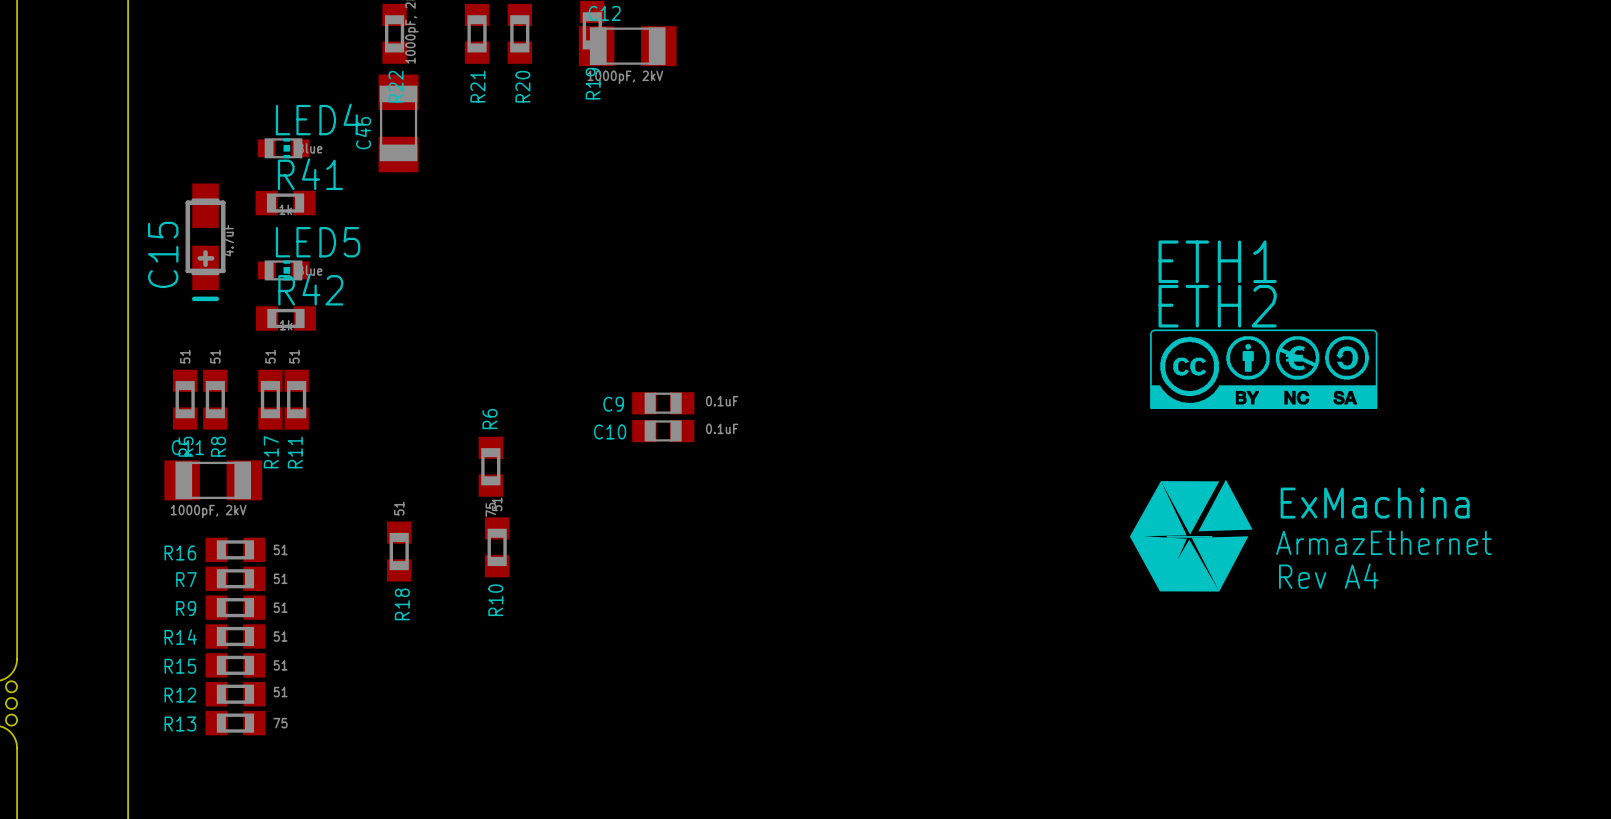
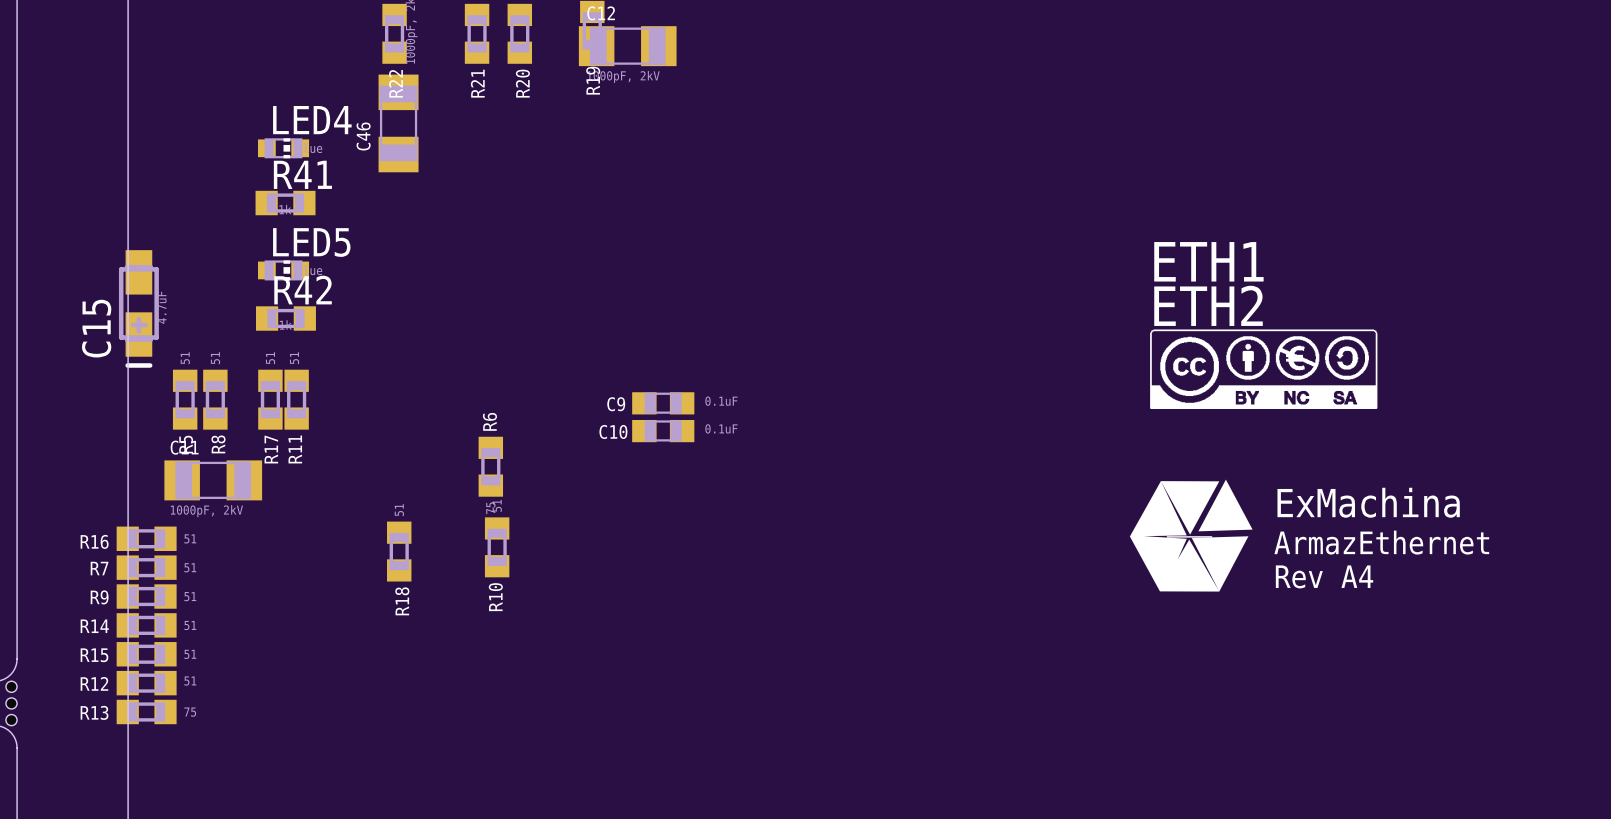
C15 position: (205, 242) -> (138, 308)
R16 position: (235, 549) -> (146, 538)
R7 position: (235, 578) -> (146, 567)
R9 position: (235, 607) -> (146, 596)
R14 position: (235, 636) -> (146, 625)
R15 position: (235, 665) -> (146, 654)
R12 position: (235, 694) -> (146, 683)
R13 position: (235, 723) -> (146, 711)

